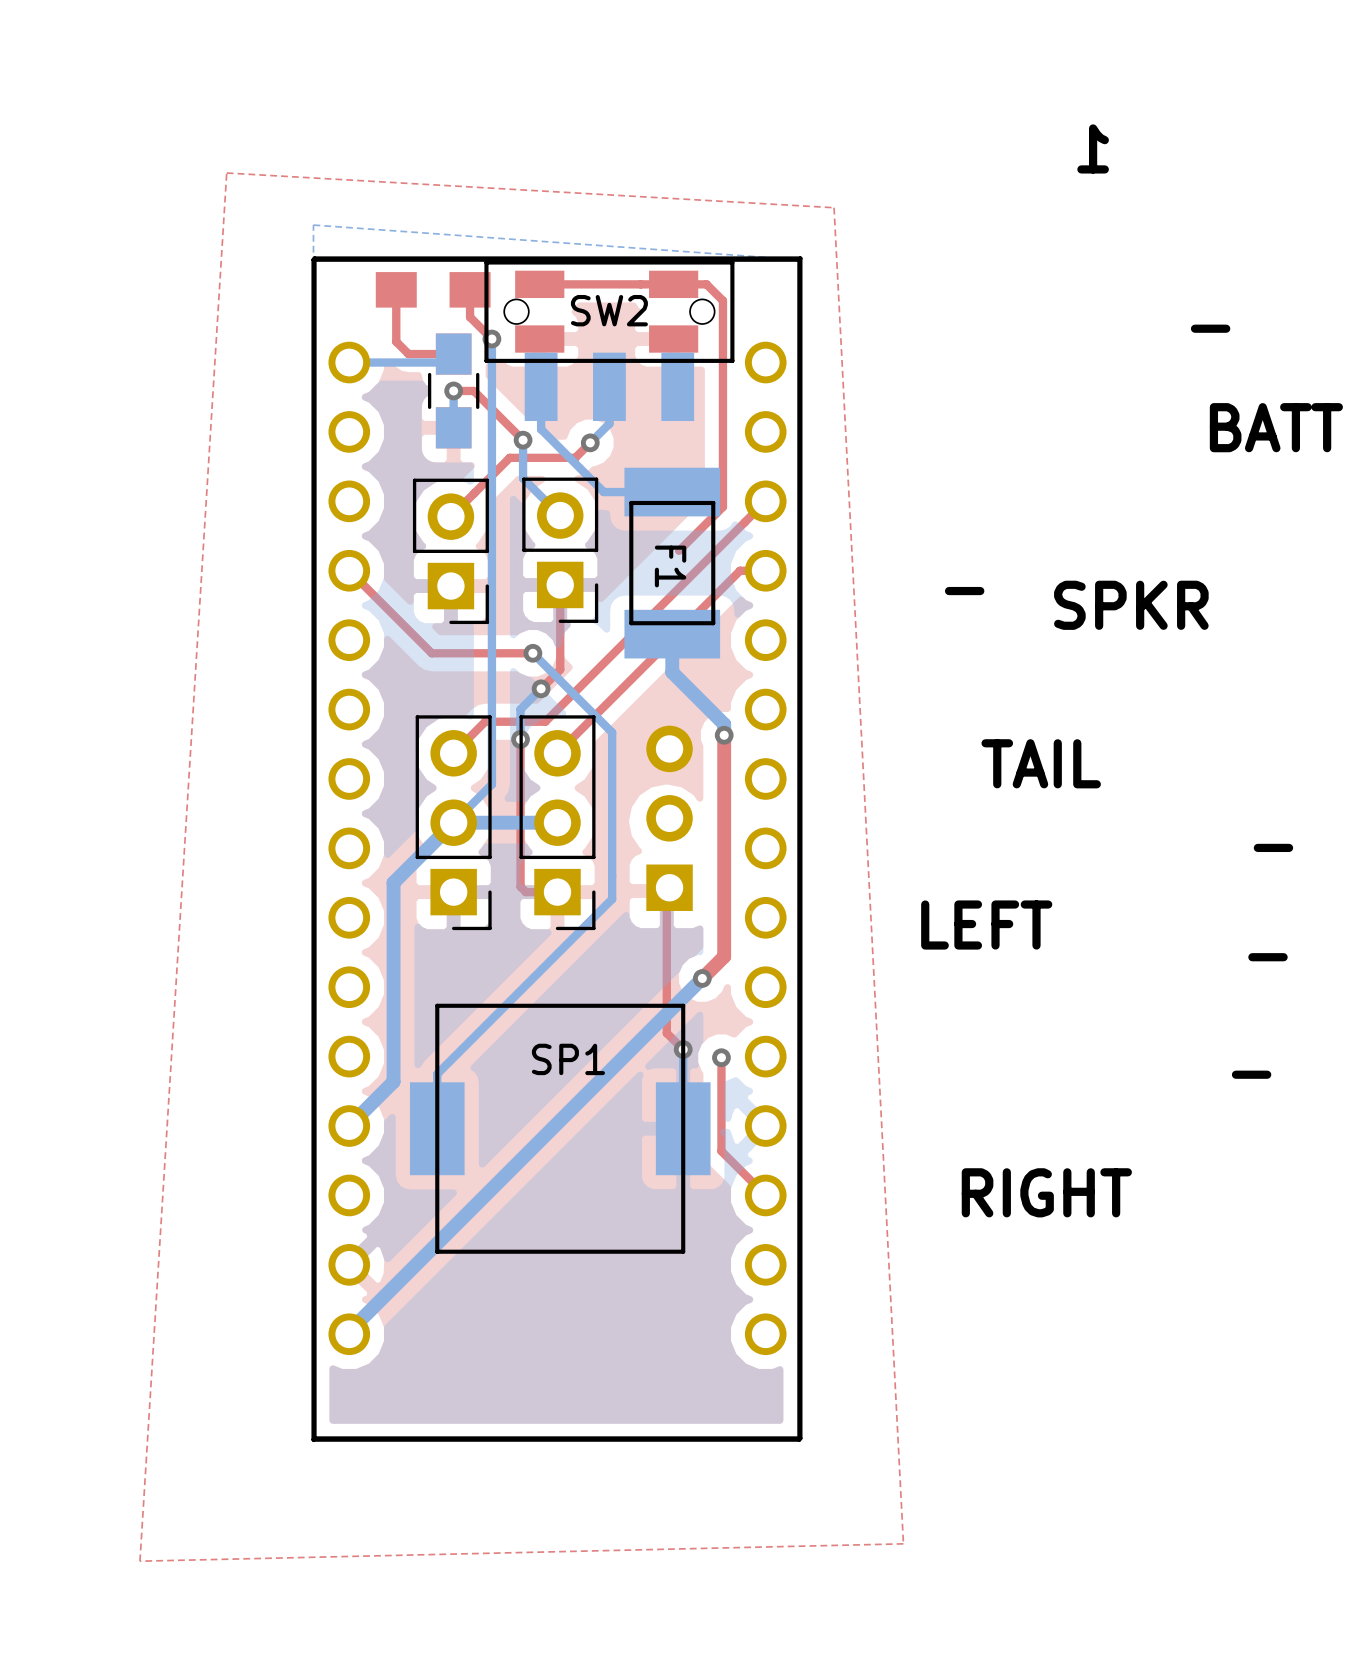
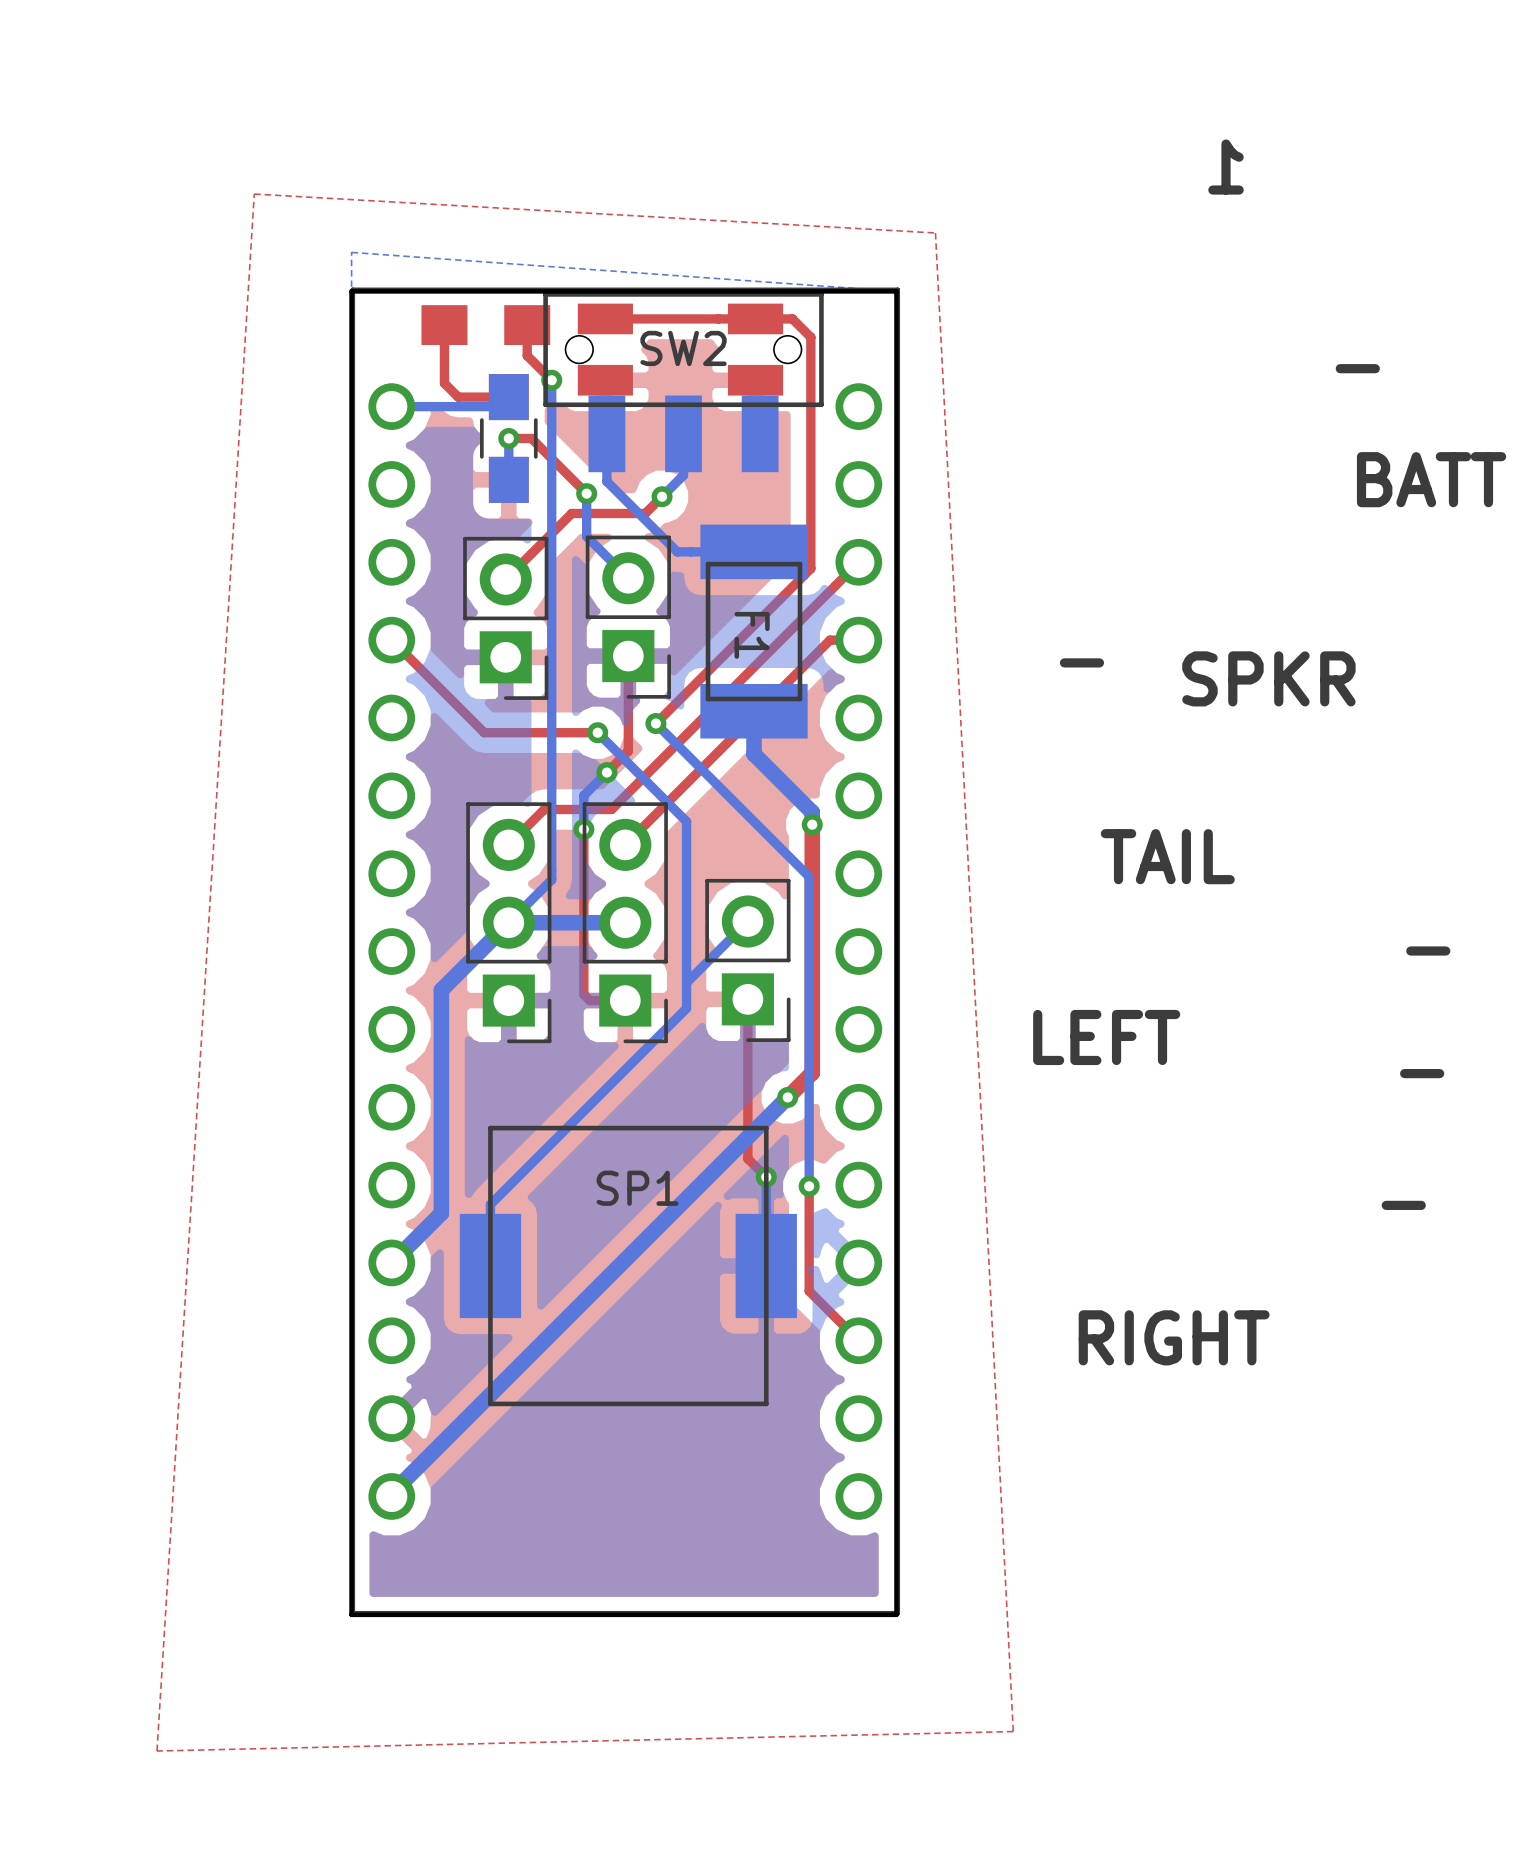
top track: none -> (761, 617) (655, 723)
bottom track: none -> (655, 723) (809, 876) (809, 1186)
via: none -> (655, 723)
part: (669, 818) -> none
bottom track: none -> (747, 921) (686, 982)
part: none -> (747, 960)

